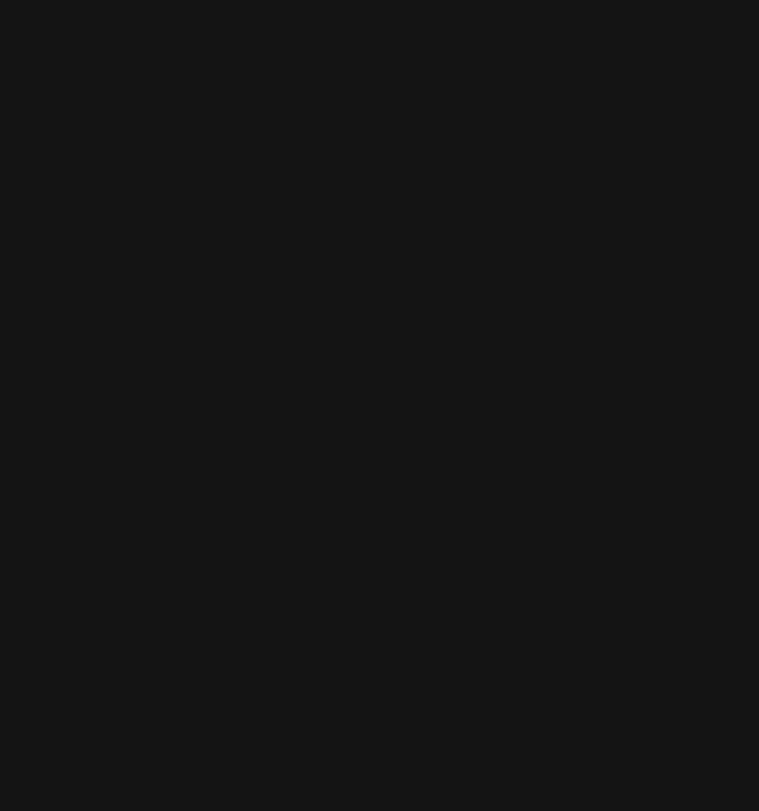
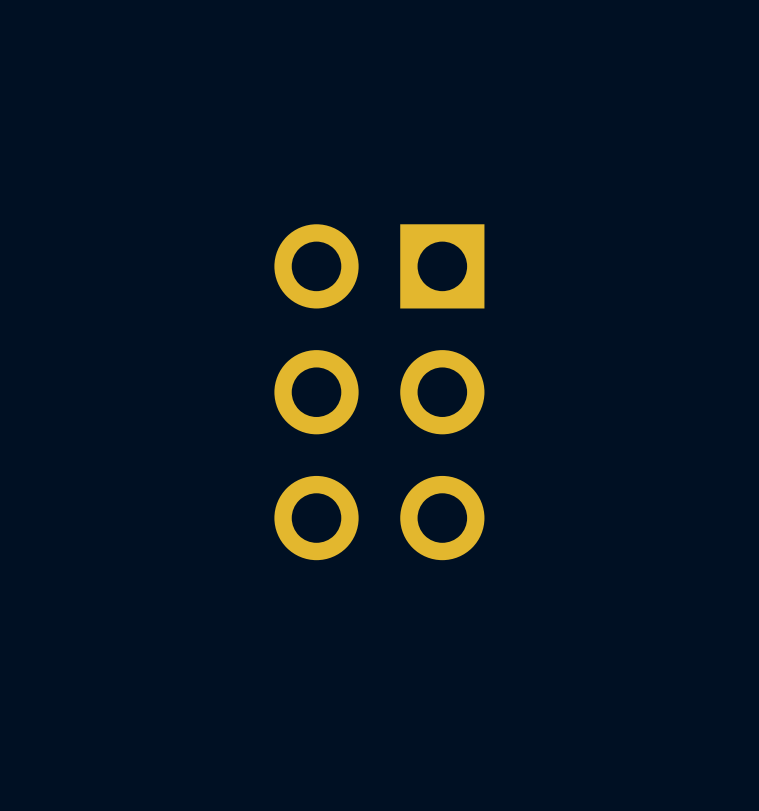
part: none -> (379, 392)

